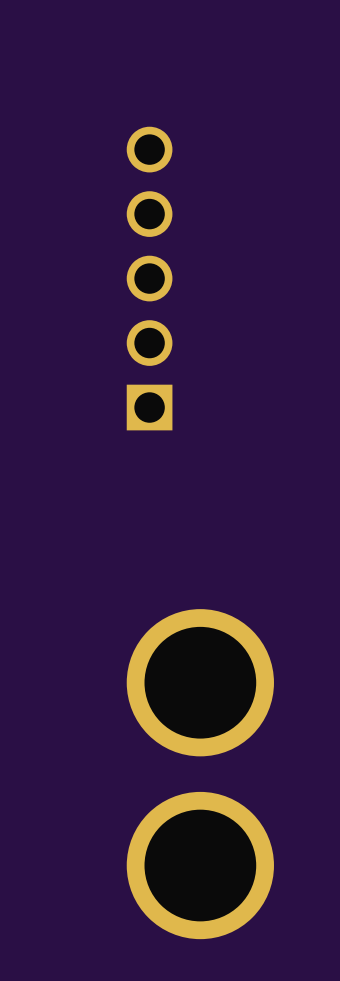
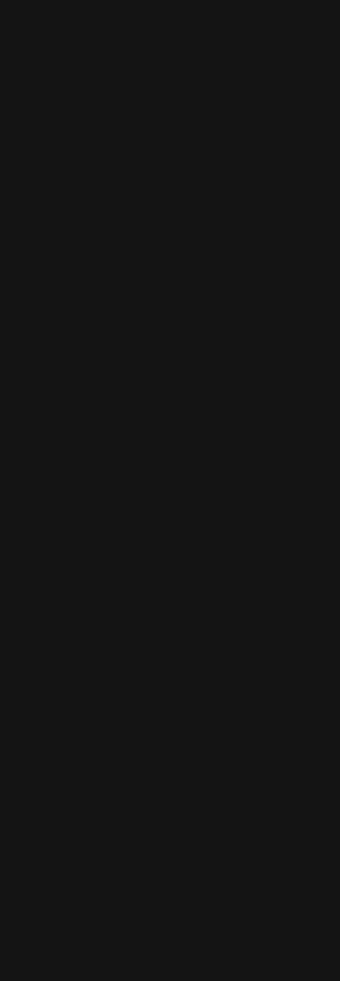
part: (149, 278) -> none
part: (200, 774) -> none

